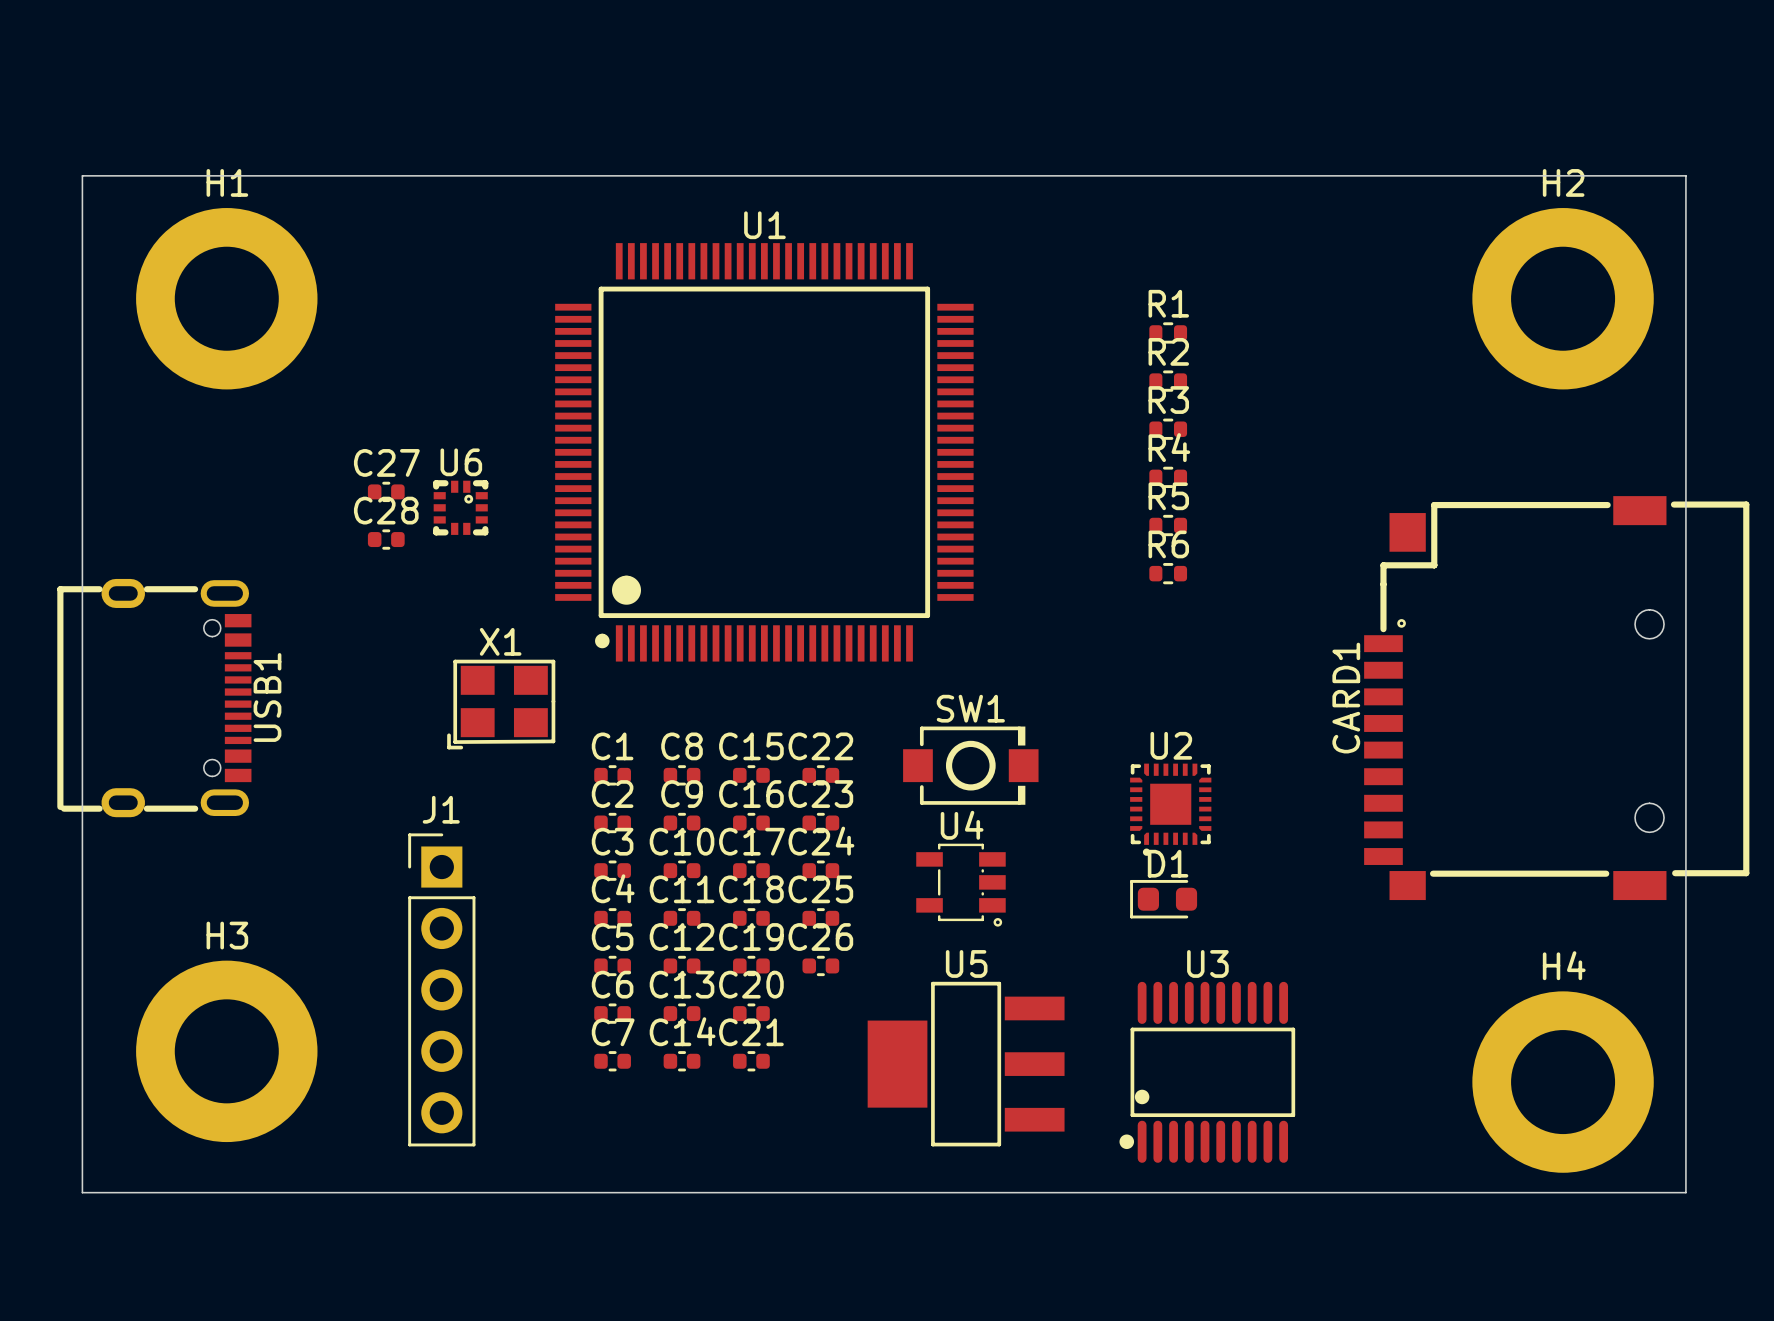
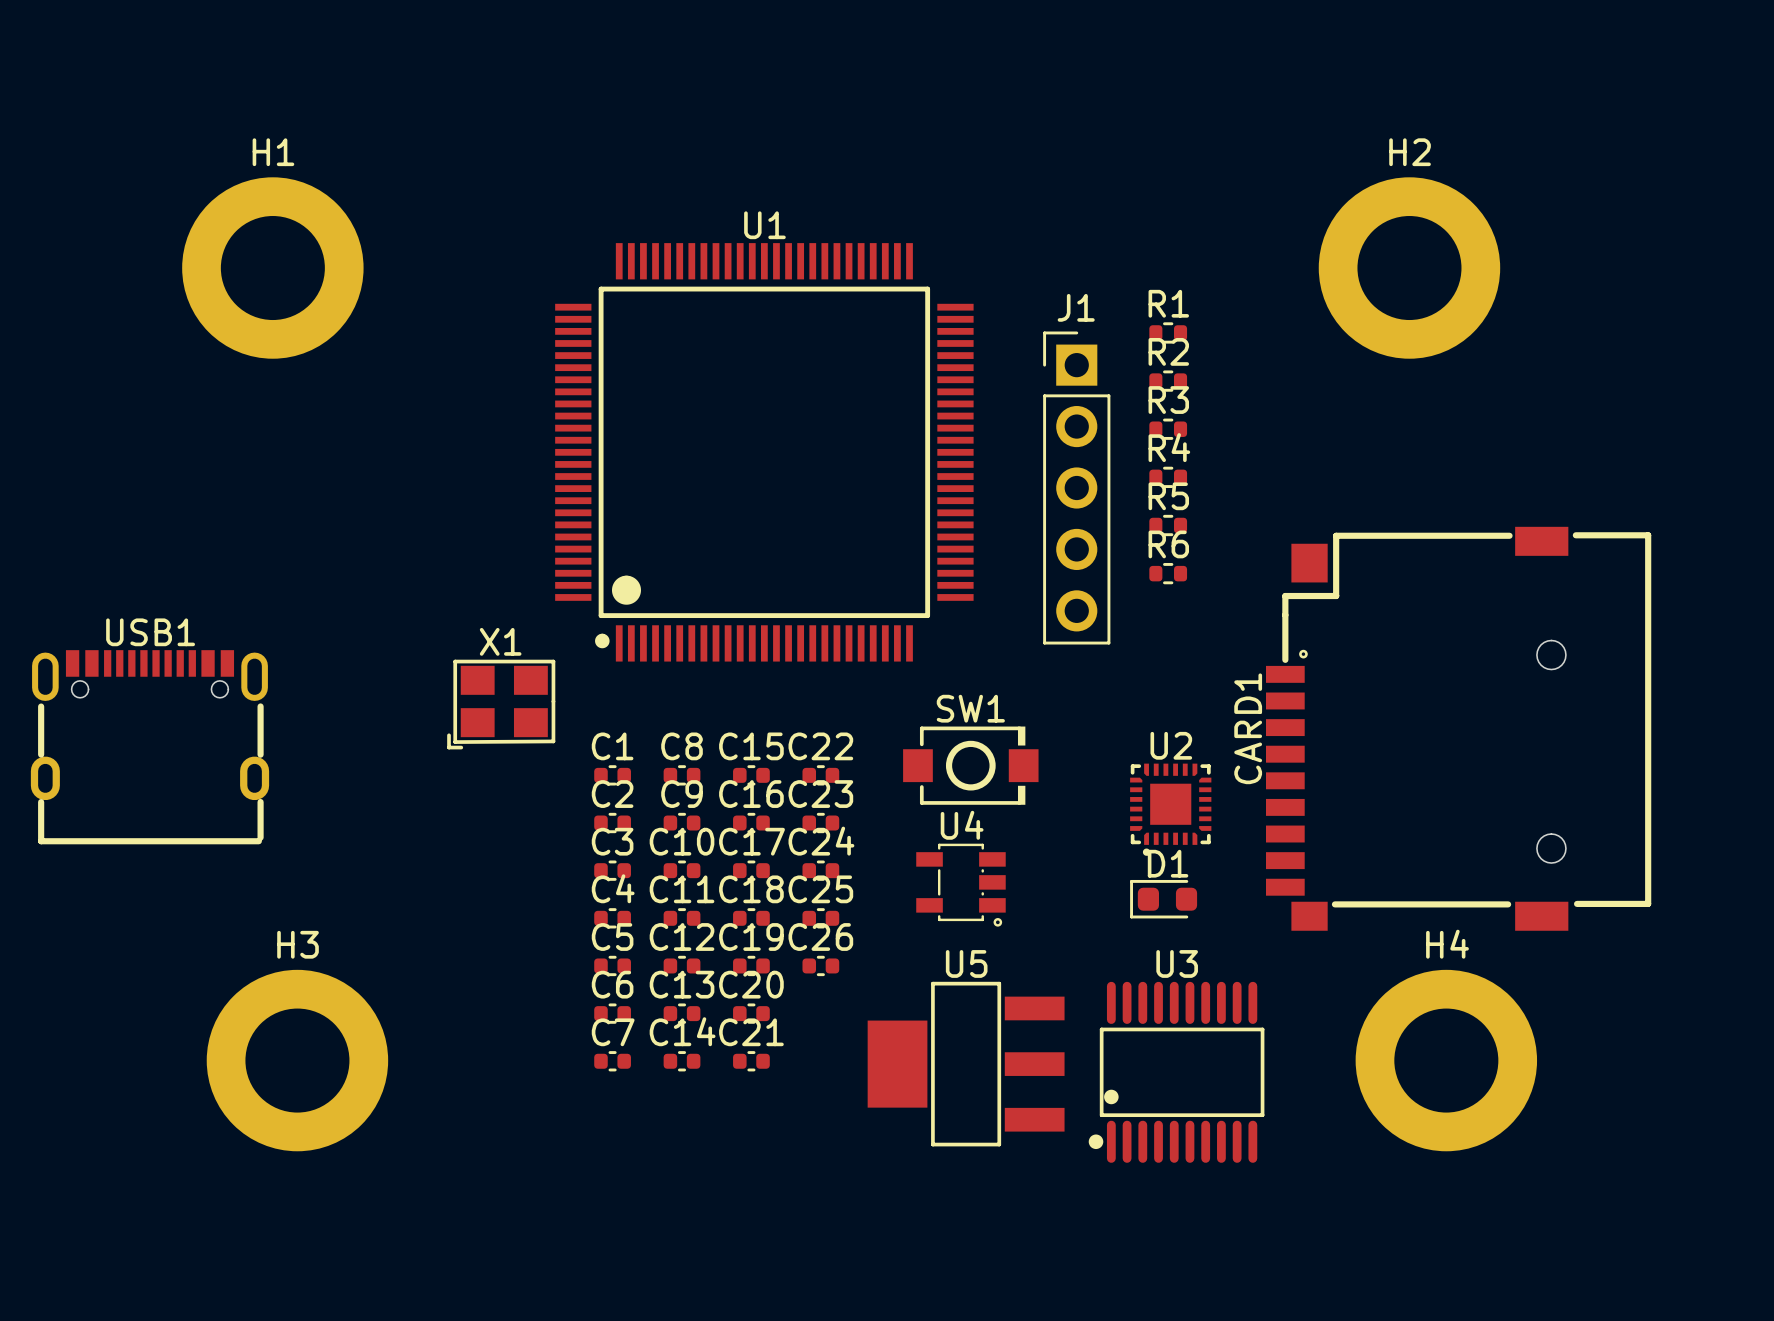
board edge: (82, 175) (1685, 175) (1685, 1192) (82, 1192) (82, 175) -> none
H1 position: (226, 298) -> (272, 268)
H2 position: (1563, 298) -> (1409, 268)
C27: (386, 491) -> none
U6: (460, 507) -> none
C28: (386, 539) -> none
USB1 rotation: 0° (154, 698) -> 90° counterclockwise (149, 747)
CARD1 position: (1556, 698) -> (1458, 728)
J1 position: (441, 989) -> (1076, 488)
H3 position: (226, 1051) -> (297, 1060)
U3 position: (1207, 1072) -> (1176, 1072)
H4 position: (1563, 1082) -> (1446, 1060)

